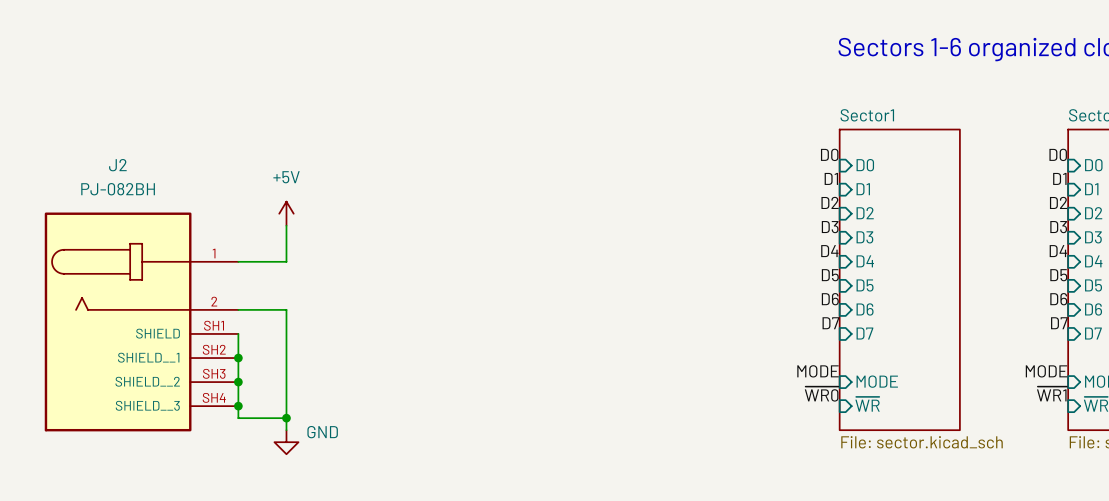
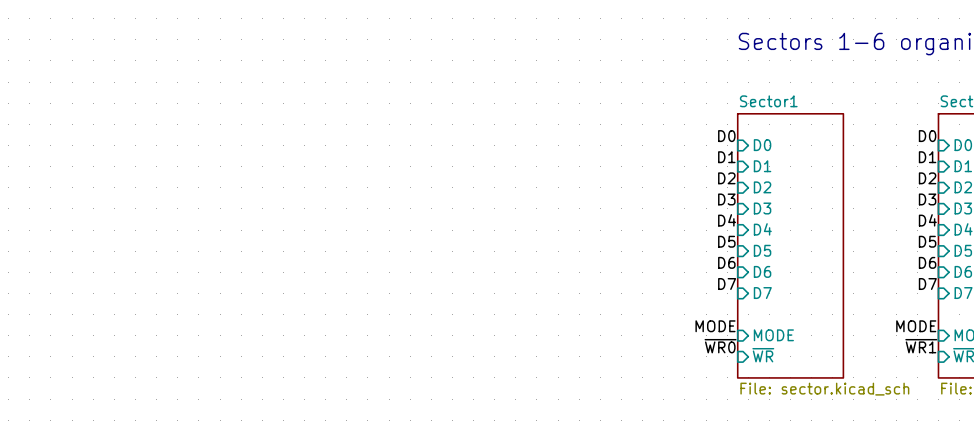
power symbol: +5V (286, 213) -> none
wire: (286, 225) (286, 261) (238, 261) -> none
wire: (238, 309) (286, 309) (286, 430) -> none
J2: PJ-082BH (141, 321) -> none
wire: (238, 333) (238, 418) (286, 418) -> none
junction: (238, 358) -> none
junction: (238, 382) -> none
junction: (238, 406) -> none
junction: (286, 418) -> none
power symbol: GND (286, 442) -> none

